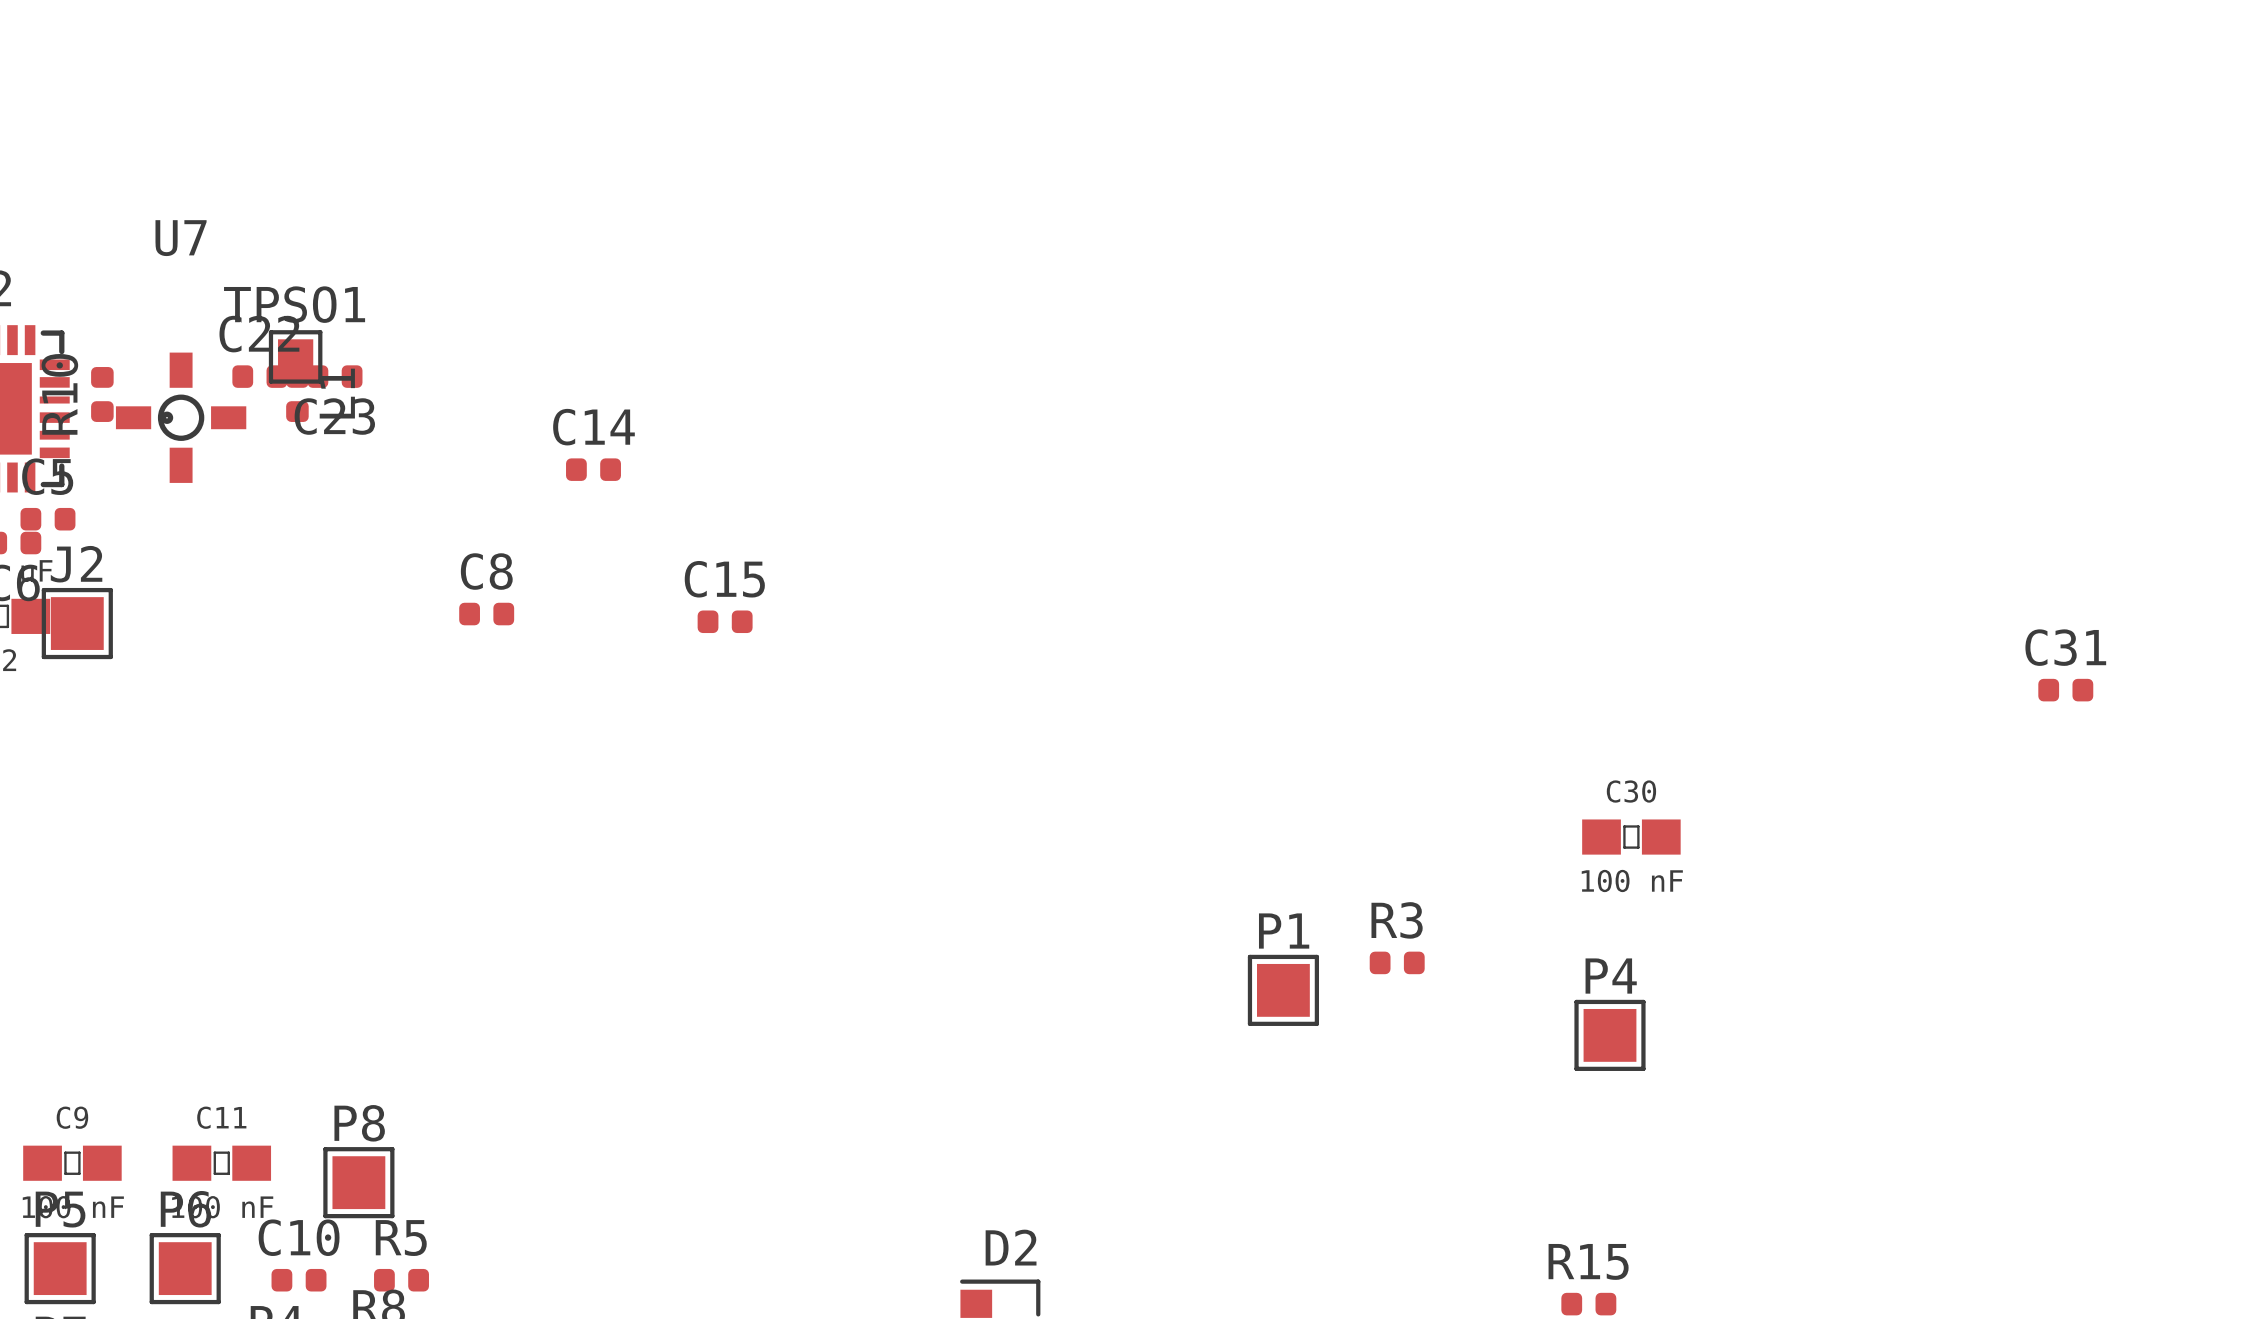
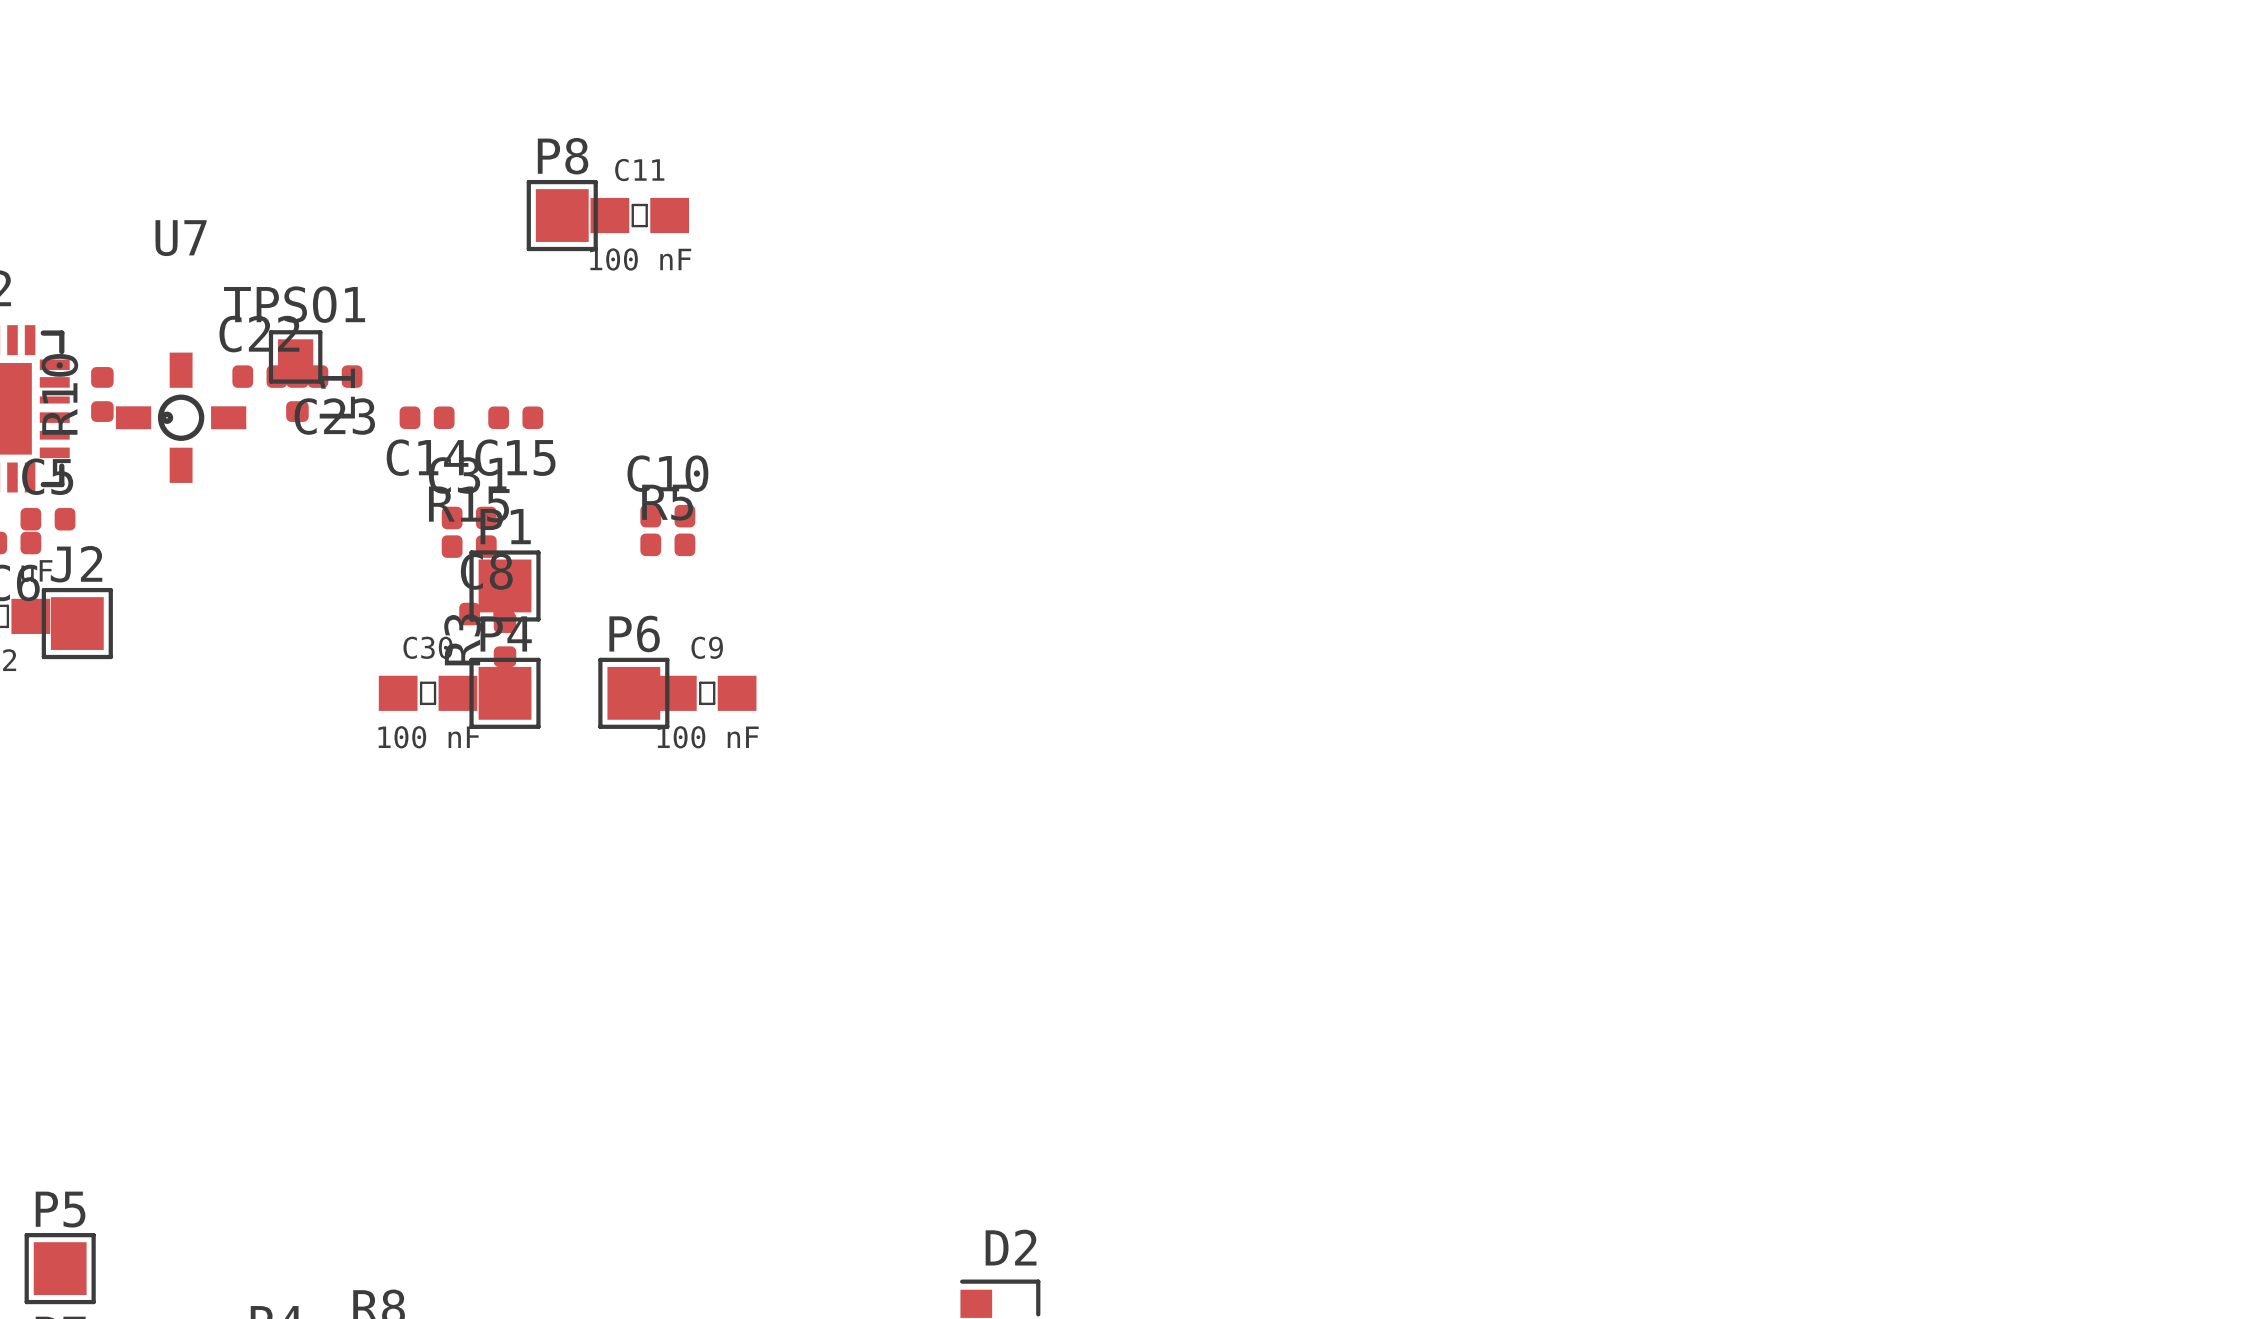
C14 name position: C14 (593, 427) -> C14 (427, 457)
C14 position: (593, 469) -> (427, 417)
C15 name position: C15 (724, 579) -> C15 (515, 457)
C15 position: (725, 621) -> (515, 417)
C31 position: (2065, 690) -> (469, 517)
C30 position: (1631, 837) -> (428, 693)
R3 rotation: 0° (1397, 962) -> 90° clockwise (505, 639)
R3 position: (1397, 962) -> (505, 639)
P1 position: (1283, 990) -> (505, 585)
P4 position: (1609, 1035) -> (505, 693)
C9 position: (72, 1163) -> (707, 693)
C11 position: (221, 1163) -> (639, 215)
P8 position: (358, 1182) -> (562, 215)
P6 position: (185, 1268) -> (633, 693)
C10 position: (299, 1280) -> (667, 516)
R5 position: (401, 1280) -> (667, 544)
R15 position: (1588, 1304) -> (469, 546)

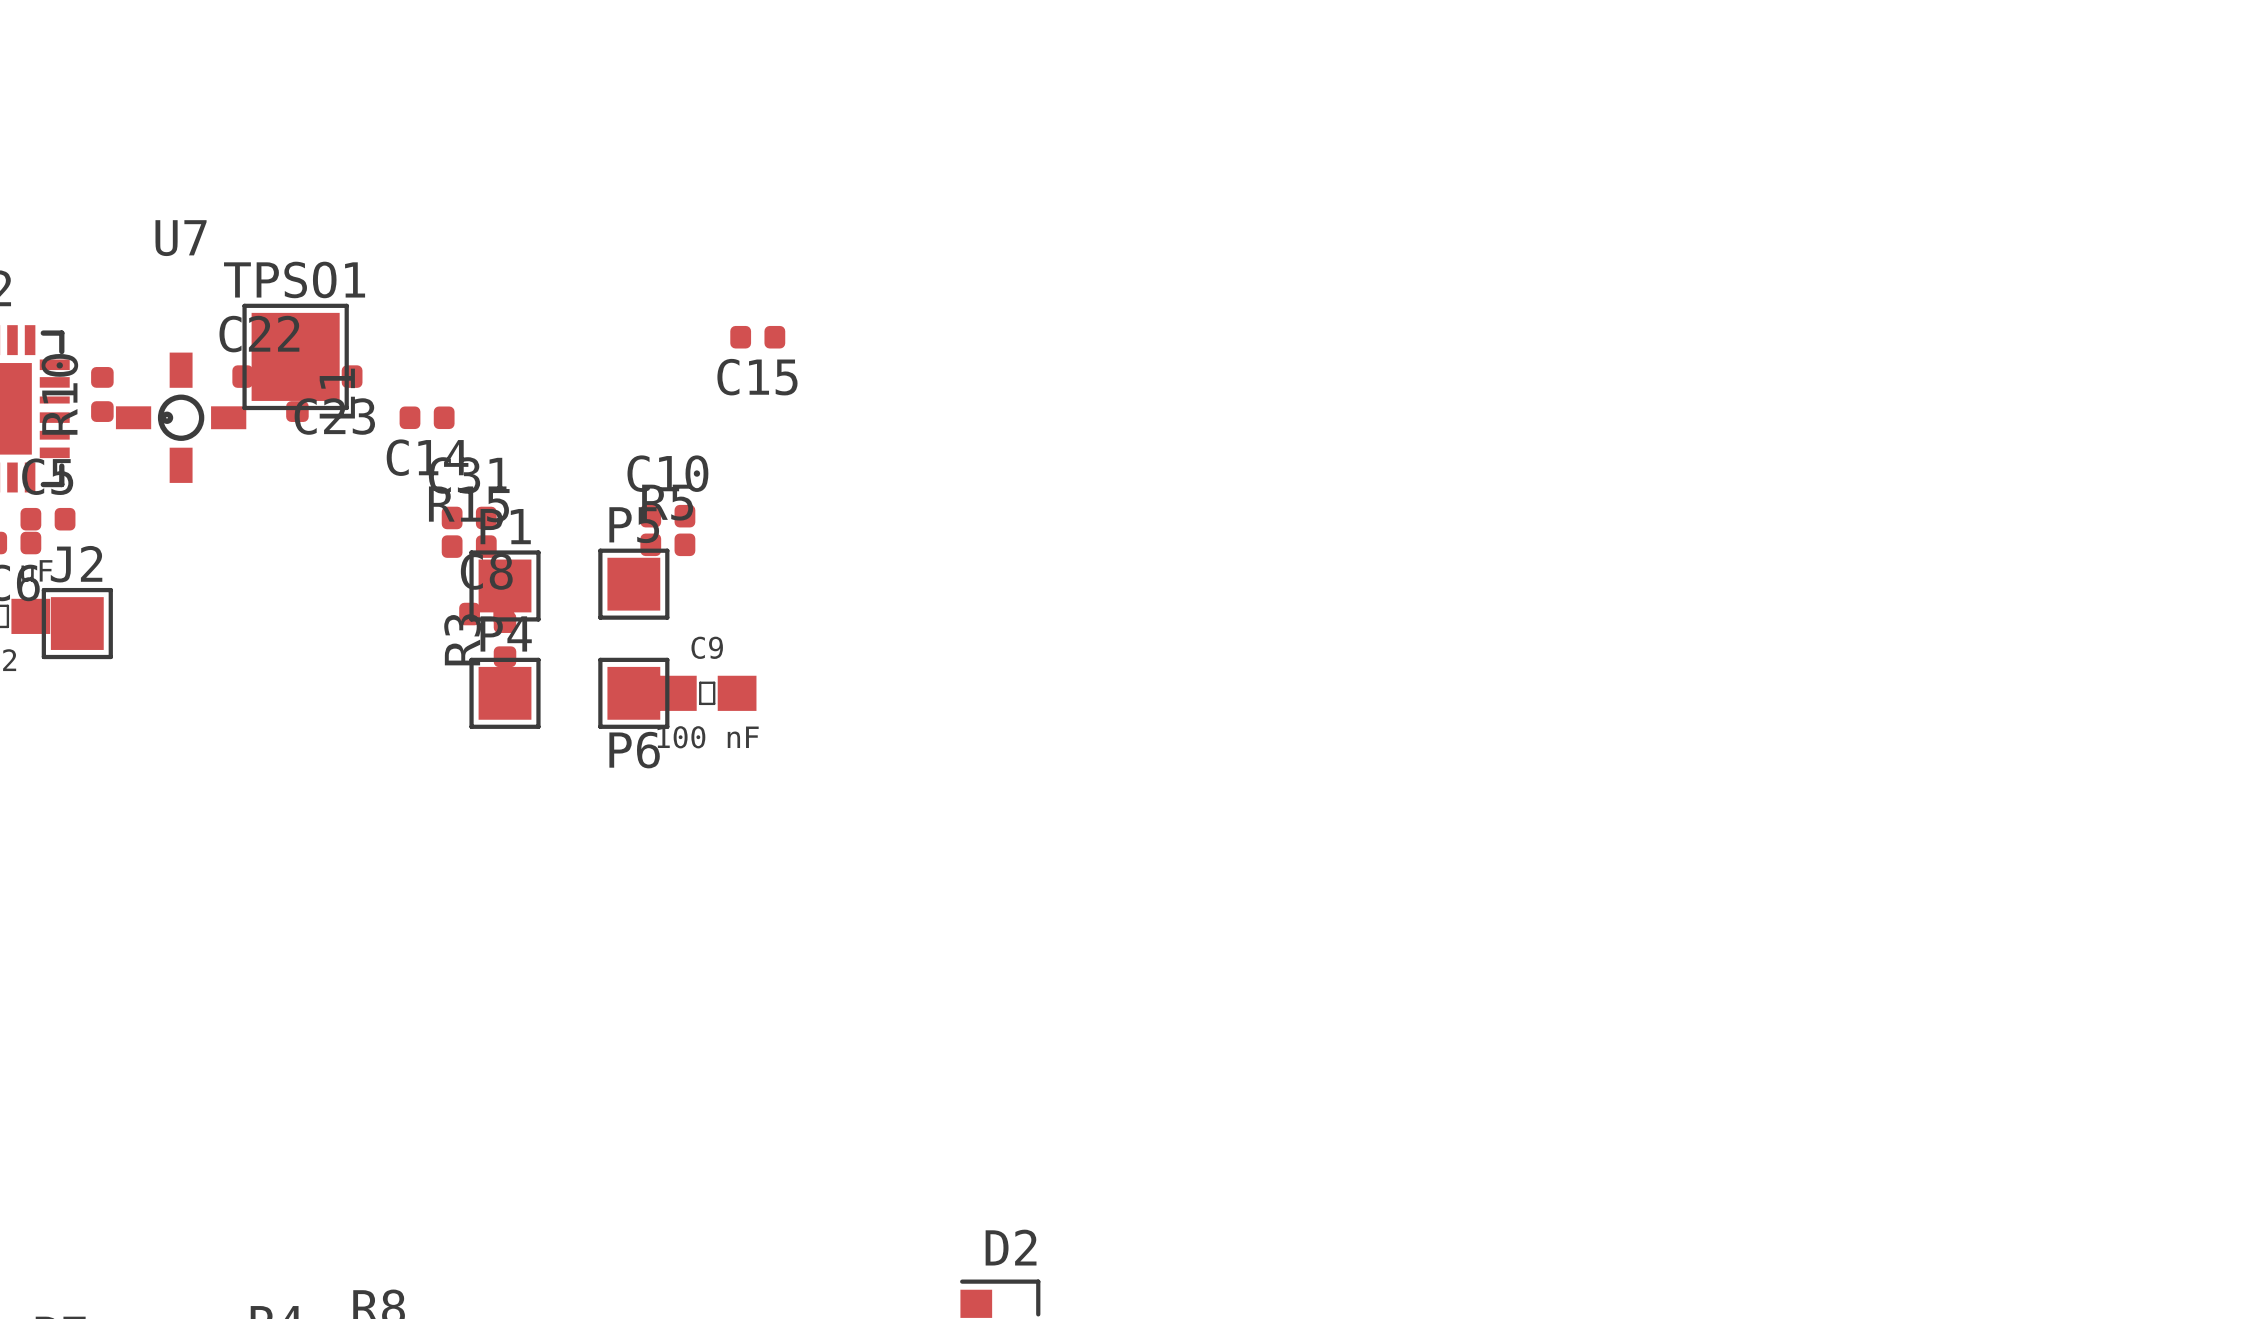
P8: (562, 215) -> none
C11: 100 nF (639, 215) -> none
TPSO1 footprint: [268, 330, 323, 384] -> [242, 303, 349, 411]
C15 position: (515, 417) -> (757, 337)
P6 name position: P6 (634, 633) -> P6 (634, 750)
C30: 100 nF (428, 693) -> none
P5 position: (60, 1268) -> (633, 584)

